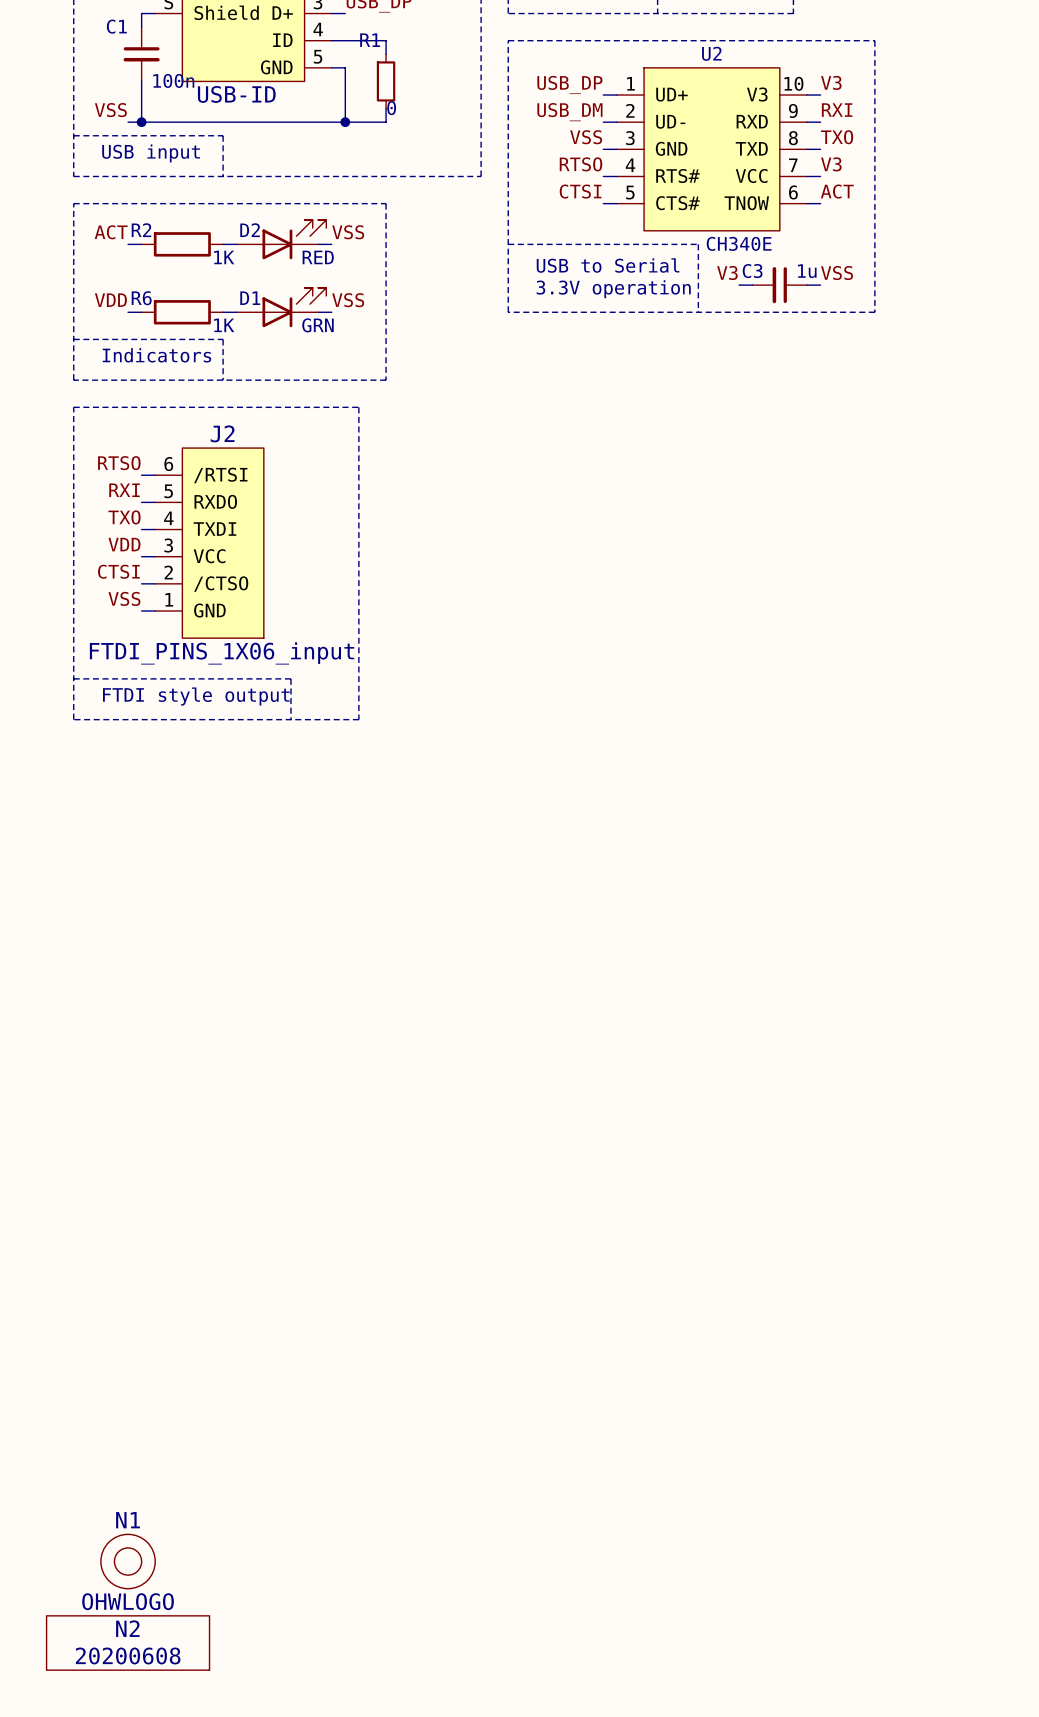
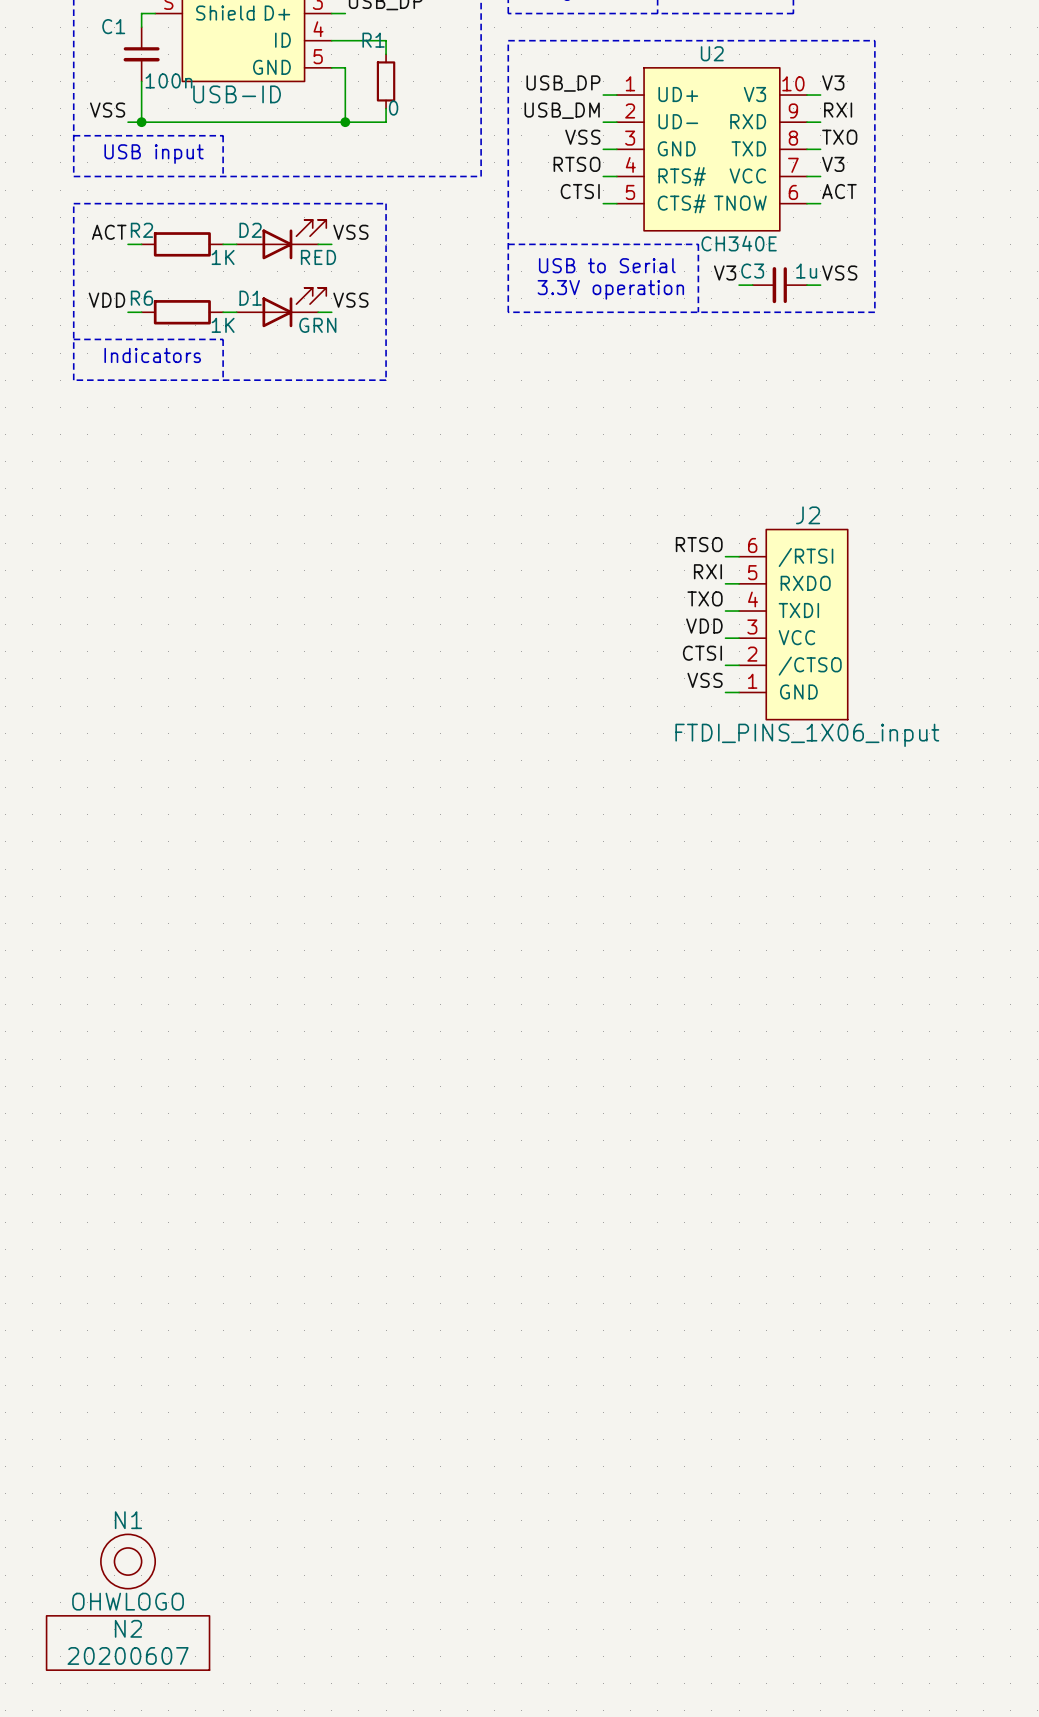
line: (73, 407) (358, 407) (358, 719) (73, 719) (73, 407) -> none
label: RTSO (119, 463) -> none
wire: (141, 475) (155, 475) -> none
label: RXI (124, 490) -> none
wire: (141, 502) (155, 502) -> none
label: TXO (124, 517) -> none
wire: (141, 529) (155, 529) -> none
J2 position: (209, 543) -> (793, 624)
label: VDD (124, 544) -> none
label: none -> RTSO (699, 544)
wire: (141, 556) (155, 556) -> none
wire: none -> (725, 556) (739, 556)
label: CTSI (118, 571) -> none
label: none -> RXI (707, 571)
wire: (141, 583) (155, 583) -> none
wire: none -> (725, 583) (739, 583)
label: VSS (124, 598) -> none
label: none -> TXO (705, 598)
wire: (141, 611) (155, 611) -> none
wire: none -> (725, 611) (739, 611)
label: none -> VDD (704, 626)
wire: none -> (725, 638) (739, 638)
label: none -> CTSI (702, 653)
wire: none -> (725, 665) (739, 665)
line: (73, 678) (290, 678) (290, 719) -> none
label: none -> VSS (705, 680)
wire: none -> (725, 692) (739, 692)
text: FTDI style output (196, 696) -> none
N2 value: 20200608 (128, 1655) -> 20200607 (128, 1655)

